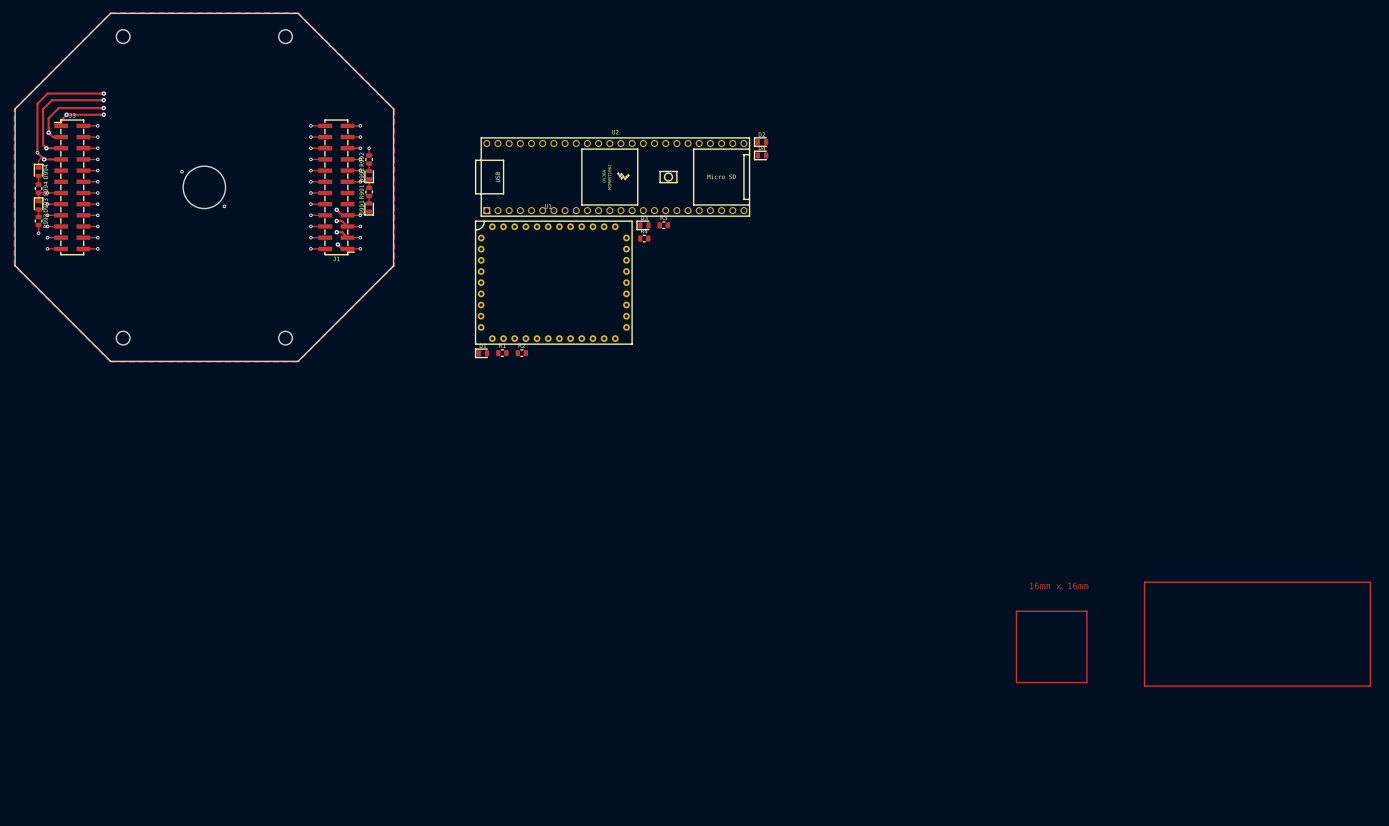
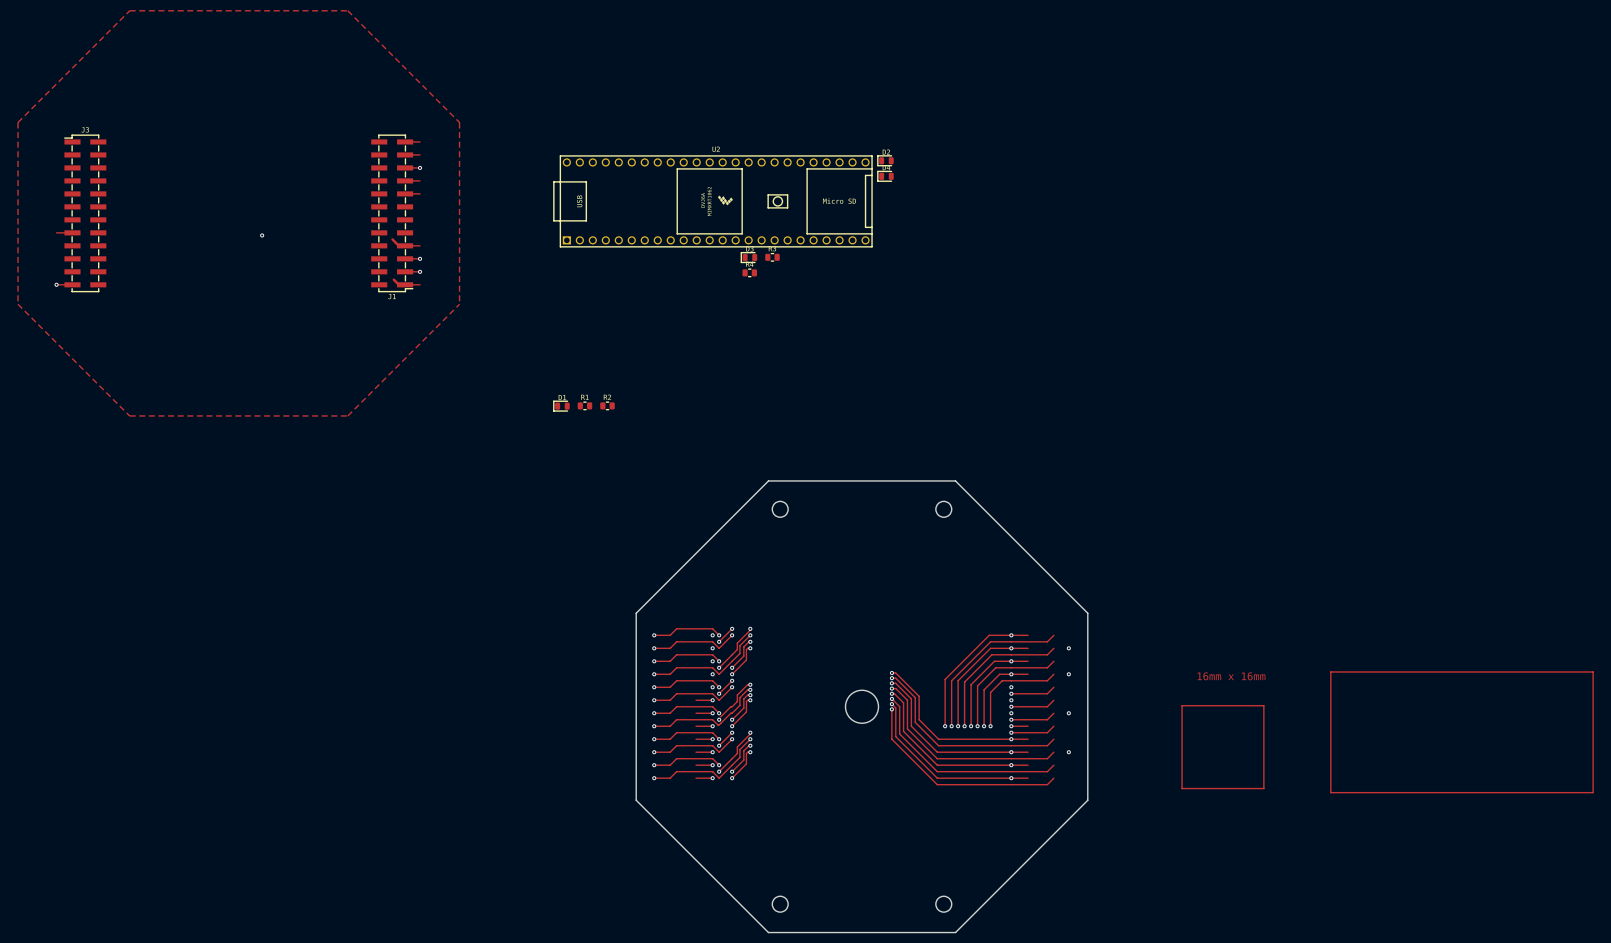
board edge: (110, 13) (15, 108) (15, 265) (110, 361) (298, 361) (393, 265) (393, 108) (298, 13) (110, 13) -> none
round board edge: [116, 29, 131, 44] -> none
round board edge: [278, 29, 293, 44] -> none
track: (103, 93) (47, 93) (37, 103) (37, 152) (44, 159) (61, 159) -> none
via: (103, 93) -> none
track: (103, 100) (52, 100) (43, 109) (43, 144) (46, 148) (61, 148) -> none
via: (103, 100) -> none
track: (103, 108) (58, 108) (48, 118) (48, 132) (53, 137) (61, 137) -> none
via: (103, 108) -> none
via: (66, 114) -> none
track: (103, 114) (66, 114) (61, 120) (61, 125) -> none
via: (103, 114) -> none
track: (83, 125) (97, 125) -> none
via: (97, 125) -> none
track: (310, 125) (325, 125) -> none
via: (310, 125) -> none
via: (360, 125) -> none
via: (48, 132) -> none
track: (83, 137) (97, 137) -> none
via: (97, 137) -> none
track: (310, 137) (325, 137) -> none
via: (310, 137) -> none
via: (360, 137) -> none
via: (46, 148) -> none
track: (83, 148) (97, 148) -> none
via: (97, 148) -> none
track: (310, 148) (325, 148) -> none
via: (310, 148) -> none
track: (369, 148) (369, 155) -> none
via: (369, 148) -> none
via: (37, 152) -> none
track: (41, 157) (38, 160) (38, 167) -> none
via: (44, 159) -> none
track: (83, 159) (97, 159) -> none
via: (97, 159) -> none
track: (310, 159) (325, 159) -> none
via: (310, 159) -> none
via: (360, 159) -> none
part: (369, 159) -> none
track: (369, 163) (369, 171) -> none
round board edge: [183, 166, 226, 209] -> none
track: (83, 170) (97, 170) -> none
via: (97, 170) -> none
track: (310, 170) (325, 170) -> none
via: (310, 170) -> none
via: (360, 170) -> none
part: (38, 171) -> none
via: (181, 171) -> none
track: (38, 175) (38, 184) -> none
part: (369, 175) -> none
track: (83, 181) (97, 181) -> none
via: (97, 181) -> none
track: (310, 181) (325, 181) -> none
via: (310, 181) -> none
track: (346, 181) (366, 181) (369, 179) (369, 187) -> none
via: (360, 181) -> none
part: (38, 188) -> none
part: (369, 191) -> none
via: (47, 192) -> none
track: (61, 192) (38, 192) (38, 201) -> none
track: (83, 192) (97, 192) -> none
via: (97, 192) -> none
track: (310, 192) (325, 192) -> none
via: (310, 192) -> none
track: (369, 195) (369, 203) -> none
part: (38, 204) -> none
via: (47, 204) -> none
track: (83, 204) (97, 204) -> none
via: (97, 204) -> none
track: (310, 204) (325, 204) -> none
via: (310, 204) -> none
part: (369, 208) -> none
track: (38, 209) (38, 216) -> none
via: (336, 209) -> none
track: (47, 215) (61, 215) -> none
via: (47, 215) -> none
track: (83, 215) (97, 215) -> none
via: (97, 215) -> none
track: (310, 215) (325, 215) -> none
via: (310, 215) -> none
via: (360, 215) -> none
part: (38, 221) -> none
track: (336, 221) (342, 221) (347, 226) -> none
via: (336, 221) -> none
track: (38, 225) (38, 233) -> none
track: (47, 226) (61, 226) -> none
via: (47, 226) -> none
track: (83, 226) (97, 226) -> none
via: (97, 226) -> none
track: (310, 226) (325, 226) -> none
via: (310, 226) -> none
track: (336, 232) (342, 232) (347, 237) -> none
via: (336, 232) -> none
via: (38, 233) -> none
track: (47, 237) (61, 237) -> none
via: (47, 237) -> none
track: (83, 237) (97, 237) -> none
via: (97, 237) -> none
track: (310, 237) (325, 237) -> none
via: (310, 237) -> none
via: (337, 244) -> none
track: (83, 248) (97, 248) -> none
via: (97, 248) -> none
track: (310, 248) (325, 248) -> none
via: (310, 248) -> none
via: (360, 248) -> none
part: (553, 282) -> none
round board edge: [116, 331, 131, 345] -> none
round board edge: [278, 331, 293, 345] -> none
board edge: none -> (768, 480) (955, 480) (1087, 613) (1087, 800) (955, 932) (768, 932) (636, 800) (636, 613) (768, 480)
round board edge: none -> [772, 501, 789, 518]
round board edge: none -> [935, 501, 952, 518]
track: none -> (732, 628) (719, 641)
via: none -> (732, 628)
track: none -> (750, 628) (737, 643) (737, 649) (719, 667)
via: none -> (750, 628)
track: none -> (654, 635) (670, 635) (676, 628) (712, 628) (719, 635)
via: none -> (654, 635)
via: none -> (712, 635)
via: none -> (719, 635)
track: none -> (732, 635) (719, 648) (712, 641) (676, 641) (670, 648) (654, 648)
via: none -> (732, 635)
track: none -> (750, 635) (739, 645) (739, 653) (719, 674) (712, 667) (676, 667) (670, 674) (654, 674)
via: none -> (750, 635)
via: none -> (1011, 635)
track: none -> (1028, 635) (989, 635) (945, 679) (945, 726)
track: none -> (1053, 635) (1047, 641) (990, 641) (951, 680) (951, 726)
via: none -> (719, 641)
track: none -> (750, 641) (743, 647) (743, 656) (732, 667)
via: none -> (750, 641)
via: none -> (654, 648)
via: none -> (712, 648)
track: none -> (750, 648) (746, 649) (746, 660) (732, 674)
via: none -> (750, 648)
via: none -> (1011, 648)
track: none -> (1028, 648) (990, 648) (958, 680) (958, 726)
track: none -> (1053, 648) (1047, 654) (991, 654) (964, 682) (964, 726)
via: none -> (1068, 648)
track: none -> (654, 661) (670, 661) (676, 654) (712, 654) (719, 661)
via: none -> (654, 661)
via: none -> (712, 661)
via: none -> (719, 661)
via: none -> (1011, 661)
track: none -> (1028, 661) (994, 661) (971, 684) (971, 726)
track: none -> (1053, 661) (1047, 667) (995, 667) (977, 685) (977, 726)
via: none -> (719, 667)
via: none -> (732, 667)
track: none -> (891, 672) (895, 672) (919, 696) (919, 719) (938, 739) (1028, 739)
via: none -> (891, 672)
via: none -> (654, 674)
via: none -> (712, 674)
via: none -> (732, 674)
via: none -> (1011, 674)
track: none -> (1028, 674) (999, 674) (984, 689) (984, 726)
track: none -> (1053, 674) (1047, 680) (1002, 680) (990, 692) (990, 726)
via: none -> (1068, 674)
track: none -> (891, 678) (895, 678) (915, 697) (915, 722) (938, 745) (1047, 745) (1053, 739)
via: none -> (891, 678)
track: none -> (732, 680) (719, 693)
via: none -> (732, 680)
track: none -> (891, 683) (895, 683) (911, 698) (911, 726) (937, 752) (1028, 752)
via: none -> (891, 683)
track: none -> (750, 684) (747, 684) (737, 695) (737, 701) (720, 716)
via: none -> (750, 684)
track: none -> (654, 687) (670, 687) (676, 680) (712, 680) (719, 687)
via: none -> (654, 687)
via: none -> (712, 687)
via: none -> (719, 687)
track: none -> (732, 687) (719, 700) (712, 693) (676, 693) (670, 700) (654, 700)
via: none -> (732, 687)
via: none -> (1011, 687)
track: none -> (1053, 687) (1047, 693) (1011, 693)
track: none -> (891, 688) (895, 688) (907, 700) (907, 728) (937, 758) (1047, 758) (1053, 752)
via: none -> (891, 688)
track: none -> (750, 689) (747, 689) (739, 697) (739, 705) (720, 723)
via: none -> (750, 689)
round board edge: none -> [845, 690, 879, 724]
via: none -> (719, 693)
track: none -> (891, 693) (894, 693) (903, 702) (903, 731) (937, 765) (1028, 765)
via: none -> (891, 693)
via: none -> (1011, 693)
track: none -> (750, 695) (743, 698) (743, 708) (732, 719)
via: none -> (750, 695)
track: none -> (891, 698) (899, 706) (899, 734) (937, 771) (1047, 771) (1053, 765)
via: none -> (891, 698)
via: none -> (654, 700)
track: none -> (695, 700) (712, 700)
via: none -> (712, 700)
track: none -> (750, 700) (746, 701) (746, 711) (732, 726)
via: none -> (750, 700)
via: none -> (1011, 700)
track: none -> (1053, 700) (1047, 706) (1011, 706)
track: none -> (891, 704) (895, 708) (895, 736) (937, 778) (1028, 778)
via: none -> (891, 704)
via: none -> (1011, 706)
track: none -> (891, 709) (891, 739) (937, 784) (1047, 784) (1053, 778)
via: none -> (891, 709)
track: none -> (654, 713) (670, 713) (676, 706) (712, 706) (719, 713)
via: none -> (654, 713)
track: none -> (695, 713) (712, 713)
via: none -> (712, 713)
via: none -> (719, 713)
via: none -> (1011, 713)
track: none -> (1053, 713) (1047, 719) (1011, 719)
via: none -> (1068, 713)
via: none -> (719, 719)
via: none -> (732, 719)
via: none -> (1011, 719)
track: none -> (720, 723) (717, 724) (712, 719) (676, 719) (670, 726) (654, 726)
via: none -> (654, 726)
track: none -> (695, 726) (712, 726)
via: none -> (712, 726)
via: none -> (732, 726)
via: none -> (945, 726)
via: none -> (951, 726)
via: none -> (958, 726)
via: none -> (964, 726)
via: none -> (971, 726)
via: none -> (977, 726)
via: none -> (984, 726)
via: none -> (990, 726)
track: none -> (1011, 726) (1028, 726)
via: none -> (1011, 726)
track: none -> (1053, 726) (1047, 732) (1011, 732)
track: none -> (732, 732) (719, 745)
via: none -> (732, 732)
track: none -> (750, 732) (737, 747) (737, 753) (719, 771)
via: none -> (750, 732)
via: none -> (1011, 732)
track: none -> (654, 739) (670, 739) (676, 732) (712, 732) (719, 739)
via: none -> (654, 739)
track: none -> (695, 739) (712, 739)
via: none -> (712, 739)
via: none -> (719, 739)
track: none -> (732, 739) (719, 752) (712, 745) (676, 745) (670, 752) (654, 752)
via: none -> (732, 739)
track: none -> (750, 739) (739, 749) (739, 757) (719, 778) (712, 771) (676, 771) (670, 778) (654, 778)
via: none -> (750, 739)
via: none -> (1011, 739)
via: none -> (719, 745)
track: none -> (750, 745) (743, 750) (743, 760) (732, 771)
via: none -> (750, 745)
via: none -> (654, 752)
track: none -> (695, 752) (712, 752)
via: none -> (712, 752)
track: none -> (750, 752) (746, 753) (746, 763) (732, 778)
via: none -> (750, 752)
via: none -> (1011, 752)
via: none -> (1068, 752)
track: none -> (654, 765) (670, 765) (676, 758) (712, 758) (719, 765)
via: none -> (654, 765)
track: none -> (695, 765) (712, 765)
via: none -> (712, 765)
via: none -> (719, 765)
via: none -> (1011, 765)
via: none -> (719, 771)
via: none -> (732, 771)
via: none -> (654, 778)
track: none -> (695, 778) (712, 778)
via: none -> (712, 778)
via: none -> (732, 778)
via: none -> (1011, 778)
round board edge: none -> [772, 896, 789, 913]
round board edge: none -> [935, 896, 952, 913]

